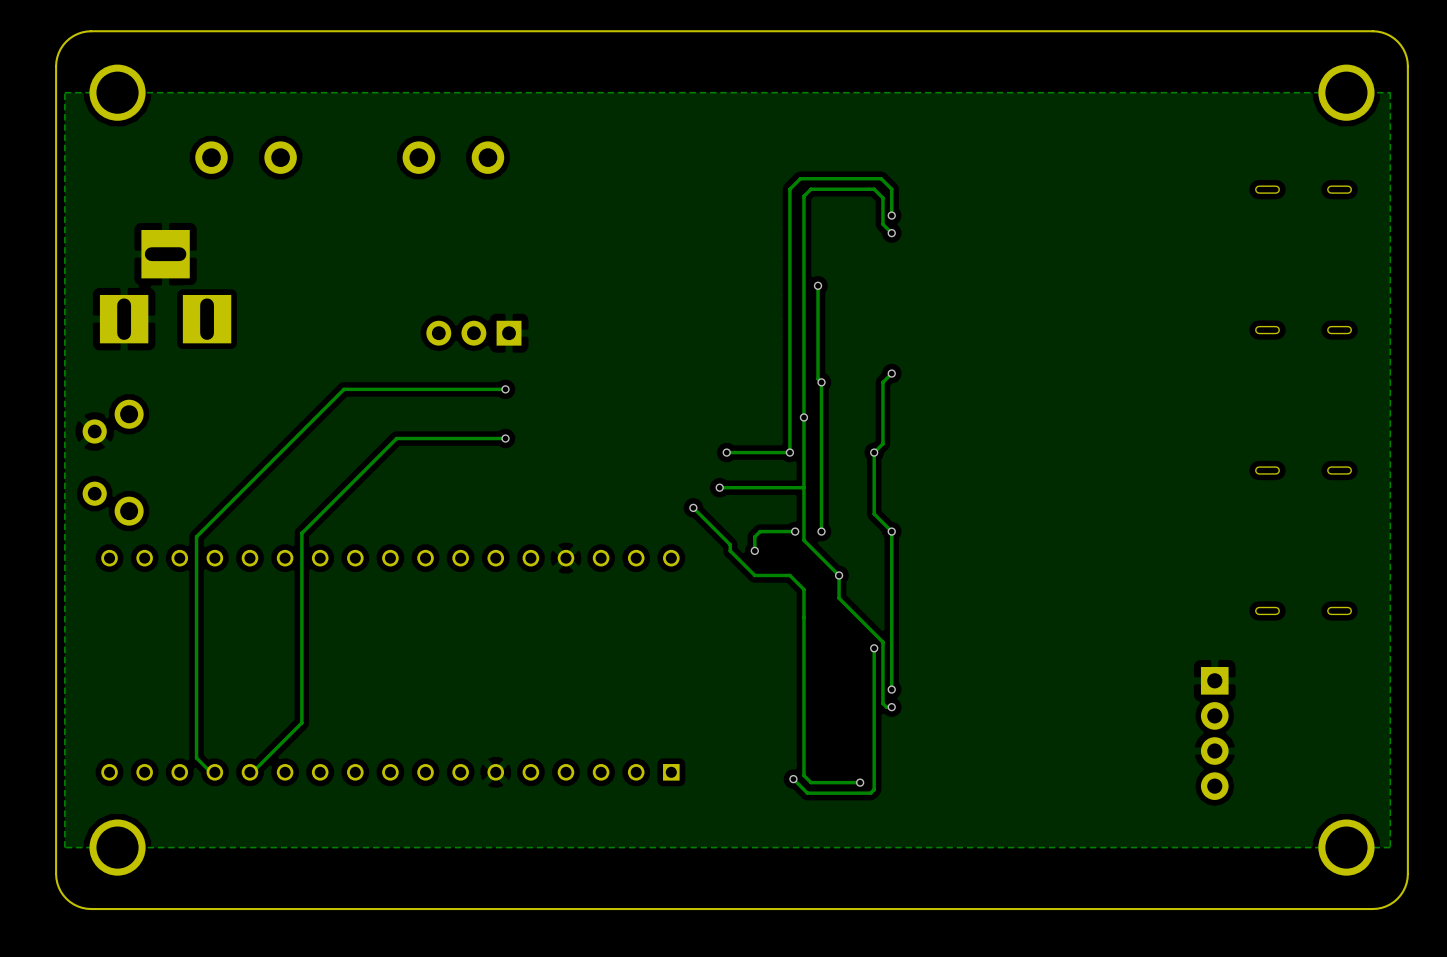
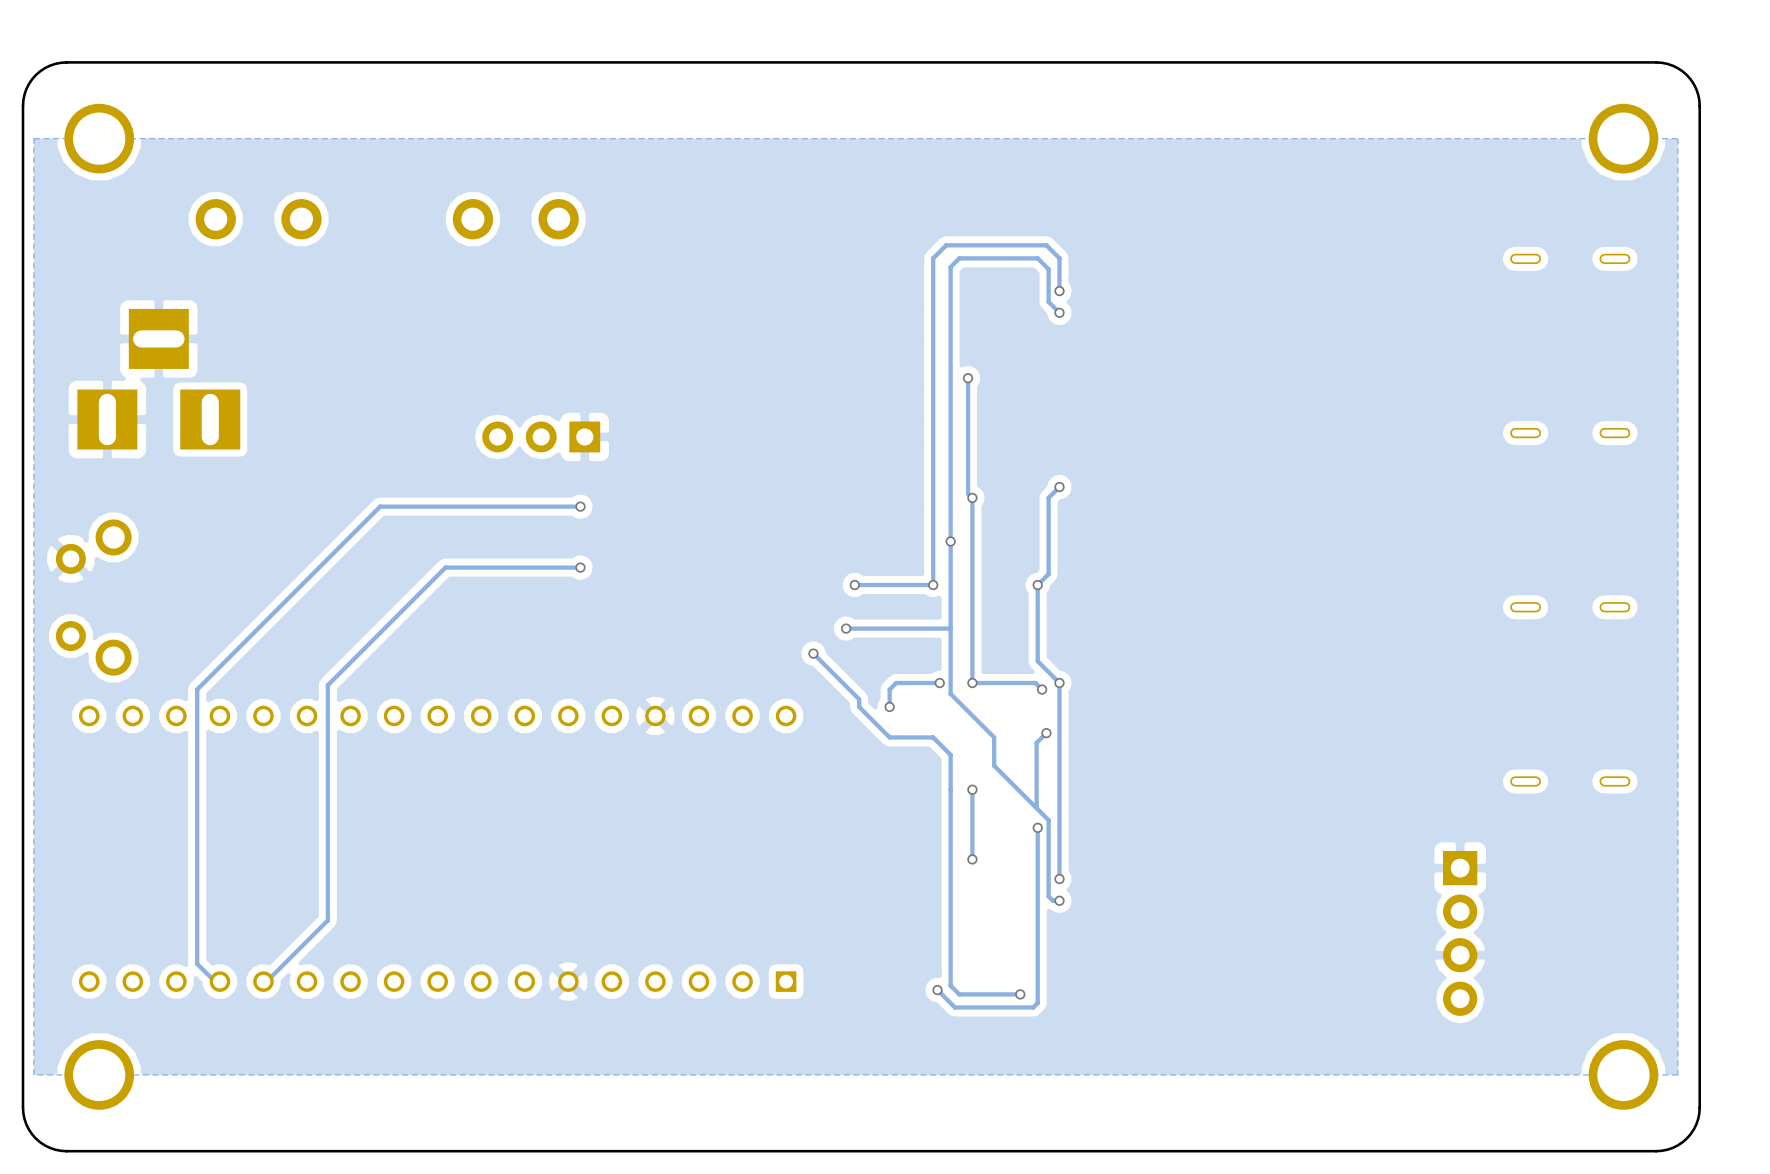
track: none -> (972, 683) (1035, 683) (1042, 689)
via: none -> (1042, 689)
track: none -> (1046, 733) (1036, 742) (1036, 808)
via: none -> (1046, 733)
via: (839, 575) -> none
track: none -> (972, 789) (972, 859)
via: none -> (972, 789)
via: none -> (972, 859)

